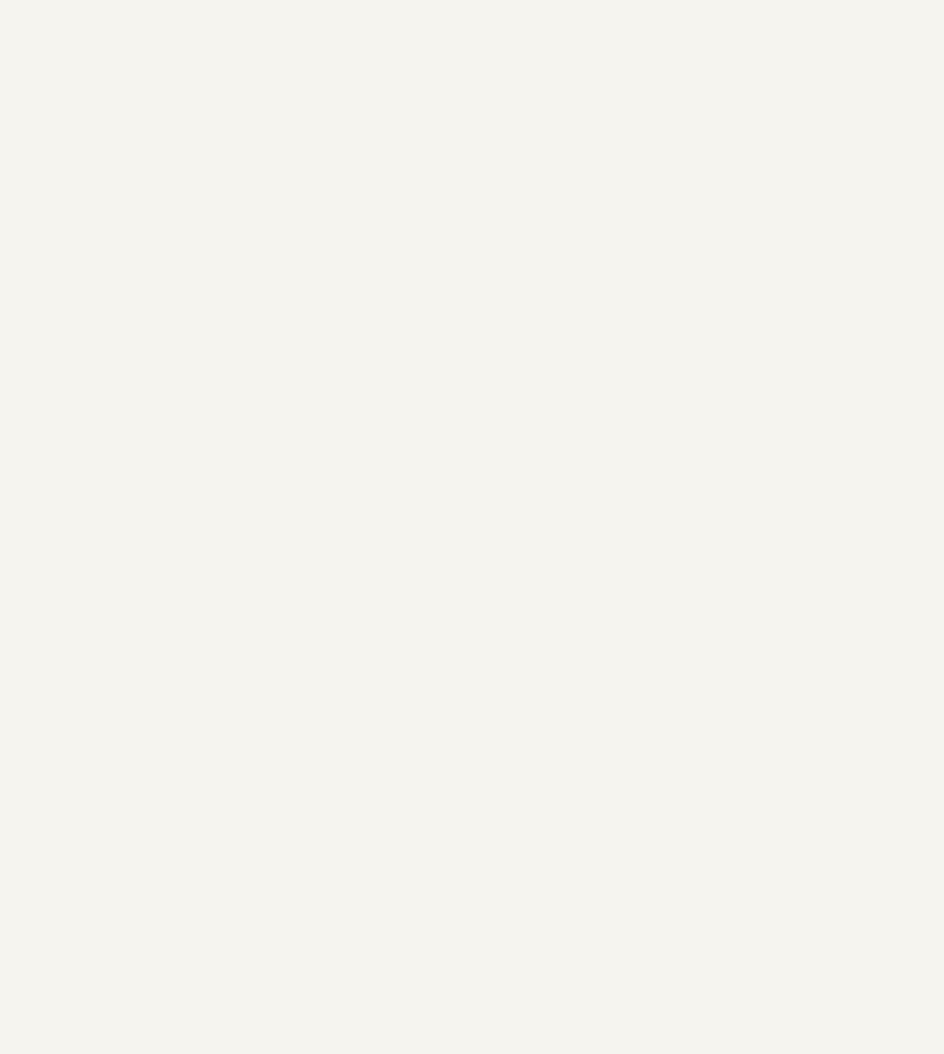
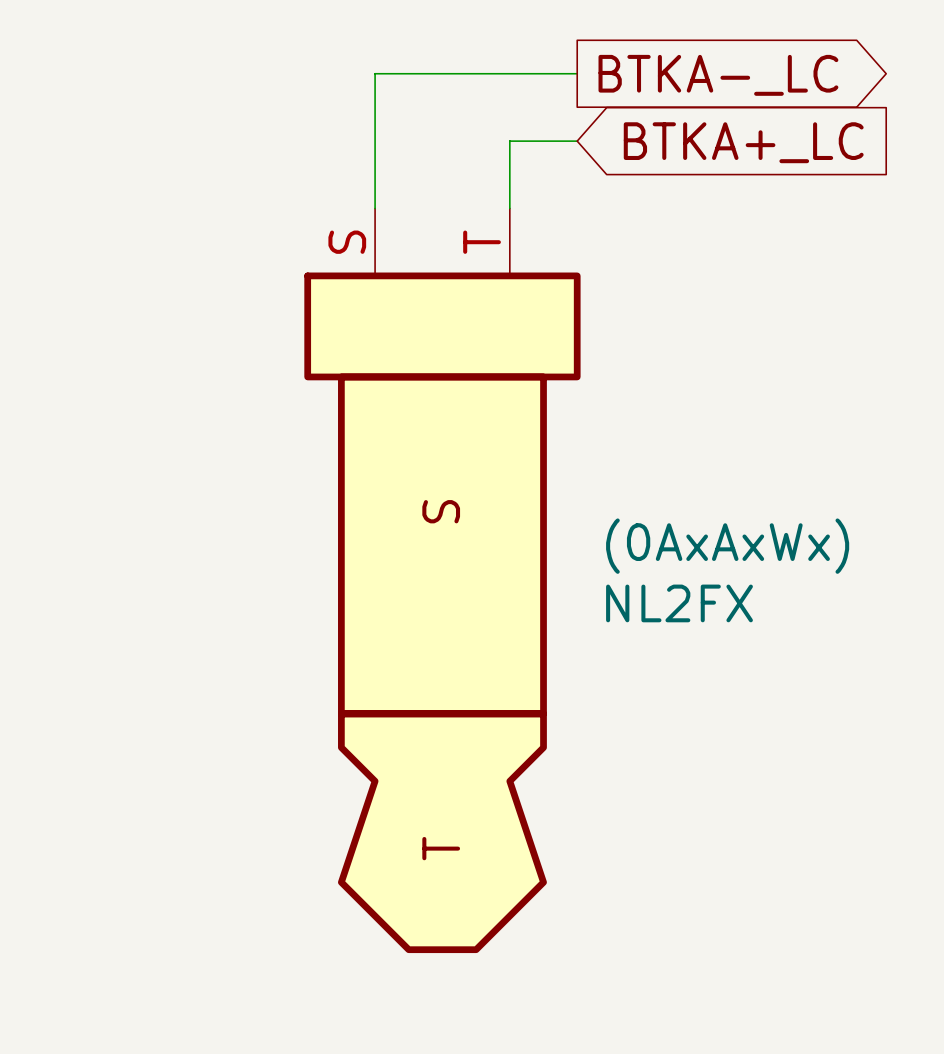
wire: none -> (577, 73) (375, 73) (375, 208)
global label: none -> BTKA-_LC (718, 75)
wire: none -> (577, 141) (509, 141) (509, 208)
global label: none -> BTKA+_LC (743, 142)
(0AxAxWx): none -> NL2FX (442, 580)

